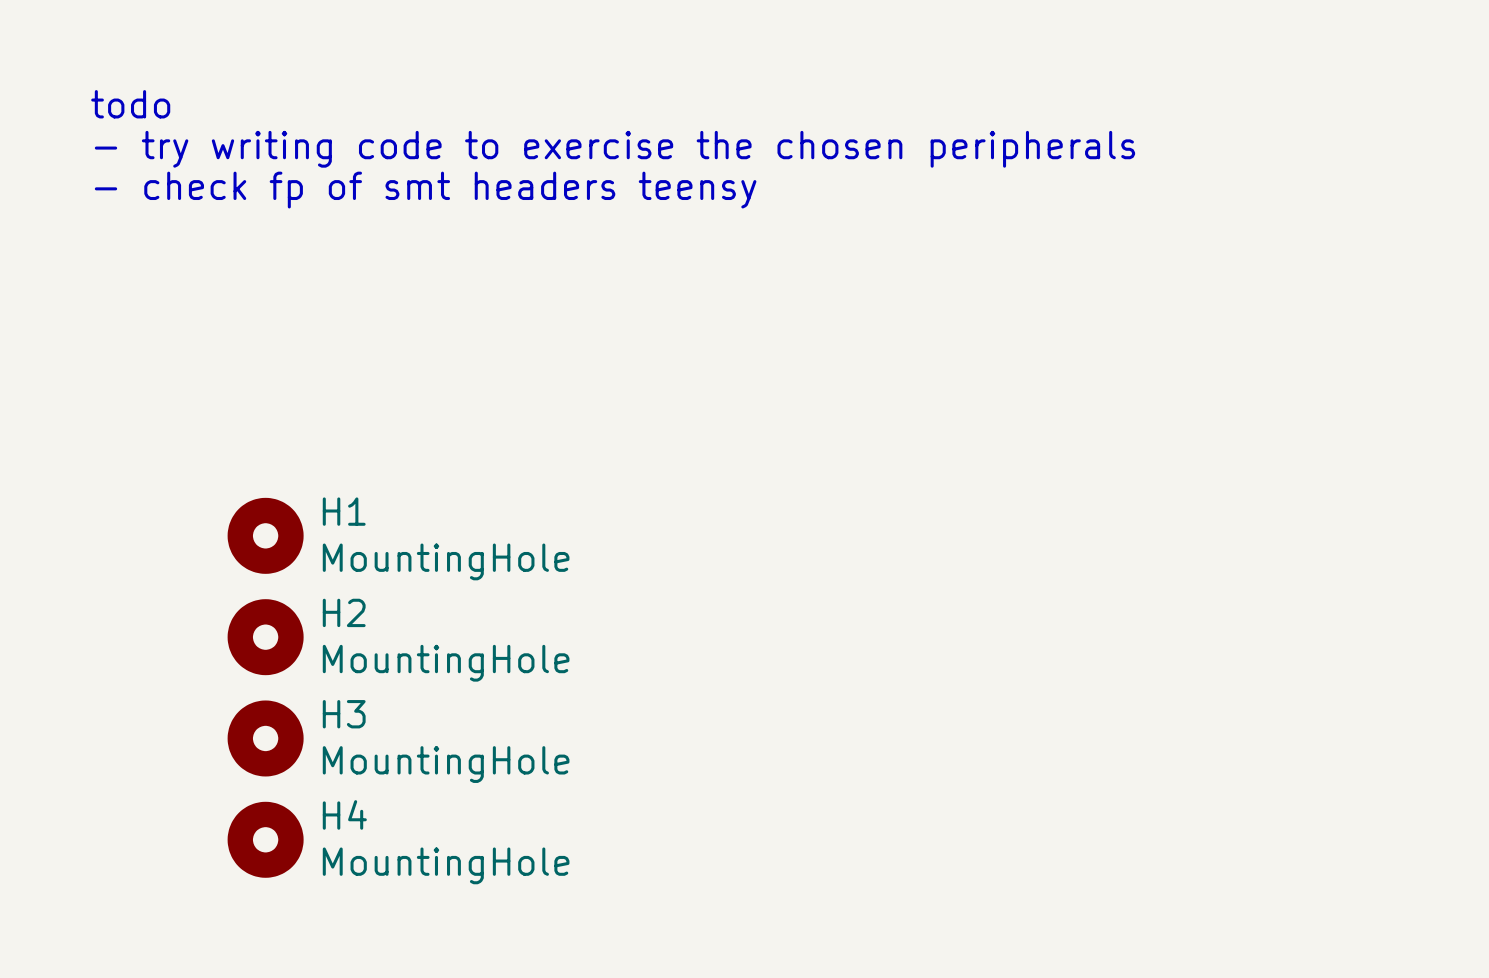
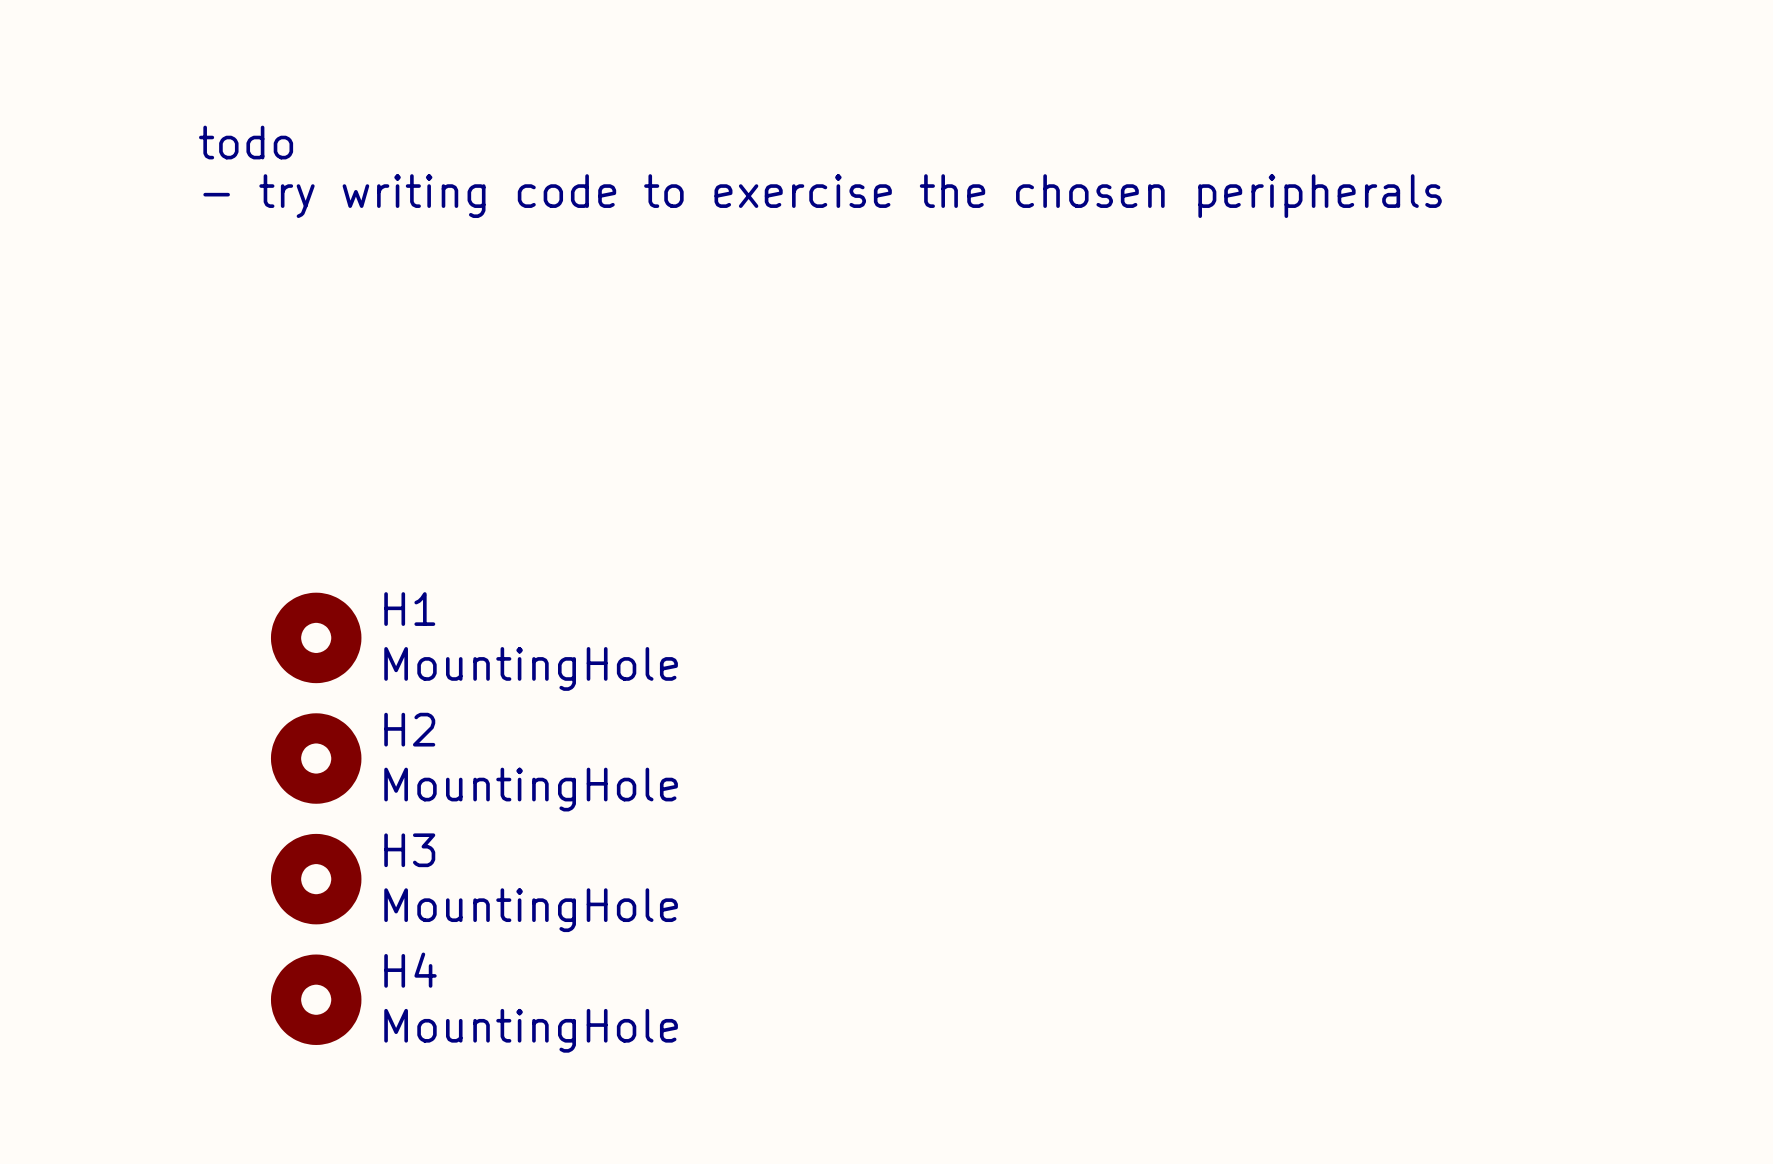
text position: todo (130, 104) -> todo (246, 142)
text position: - try writing code to exercise the chosen peripherals (614, 149) -> - try writing code to exercise the chosen peripherals (822, 196)
text: - check fp of smt headers teensy (425, 190) -> none

